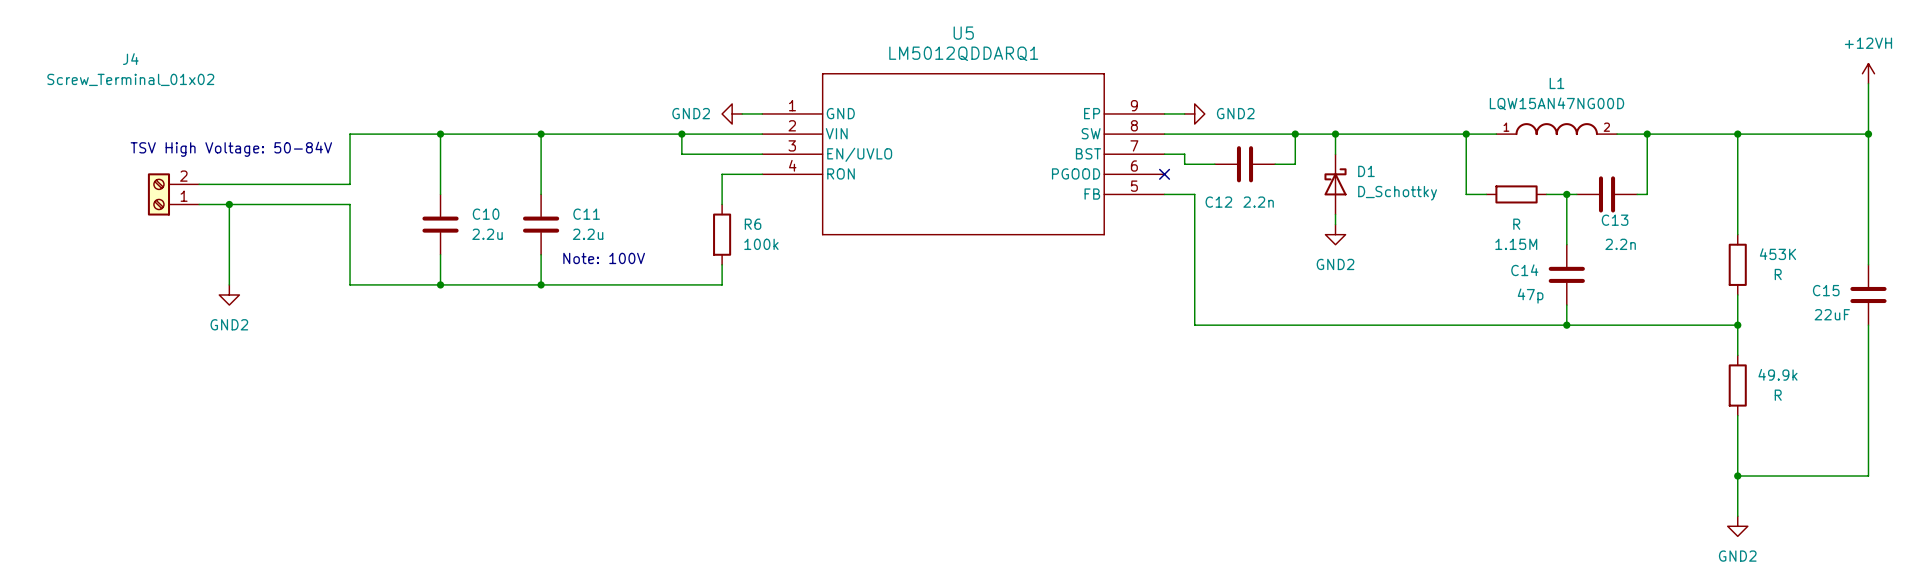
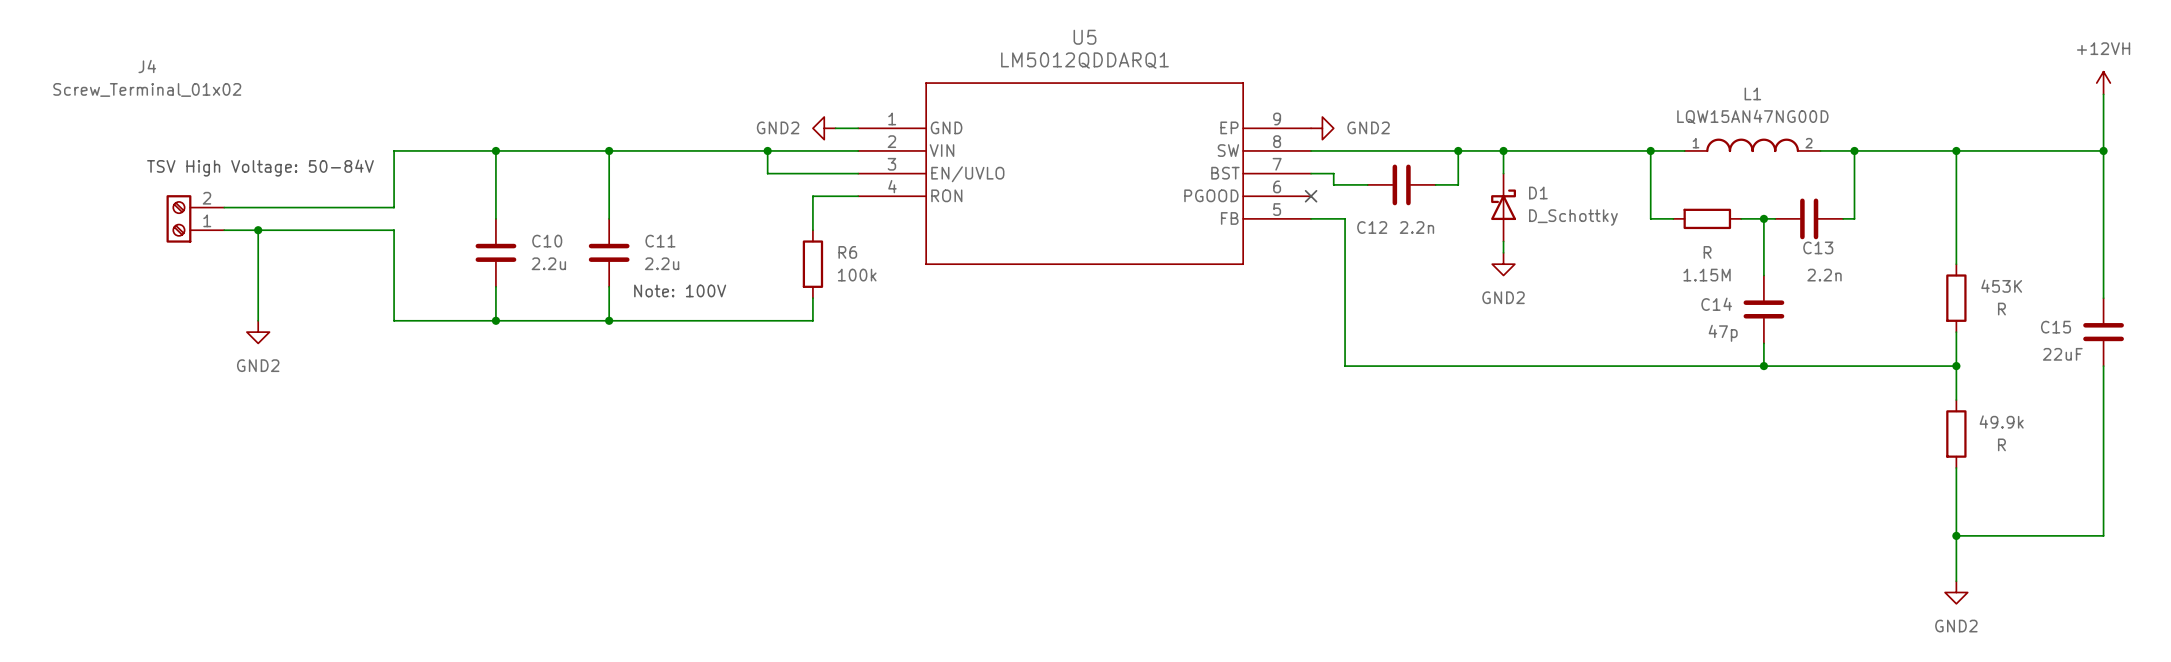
power symbol position: GND2 (1194, 113) -> GND2 (1322, 128)

